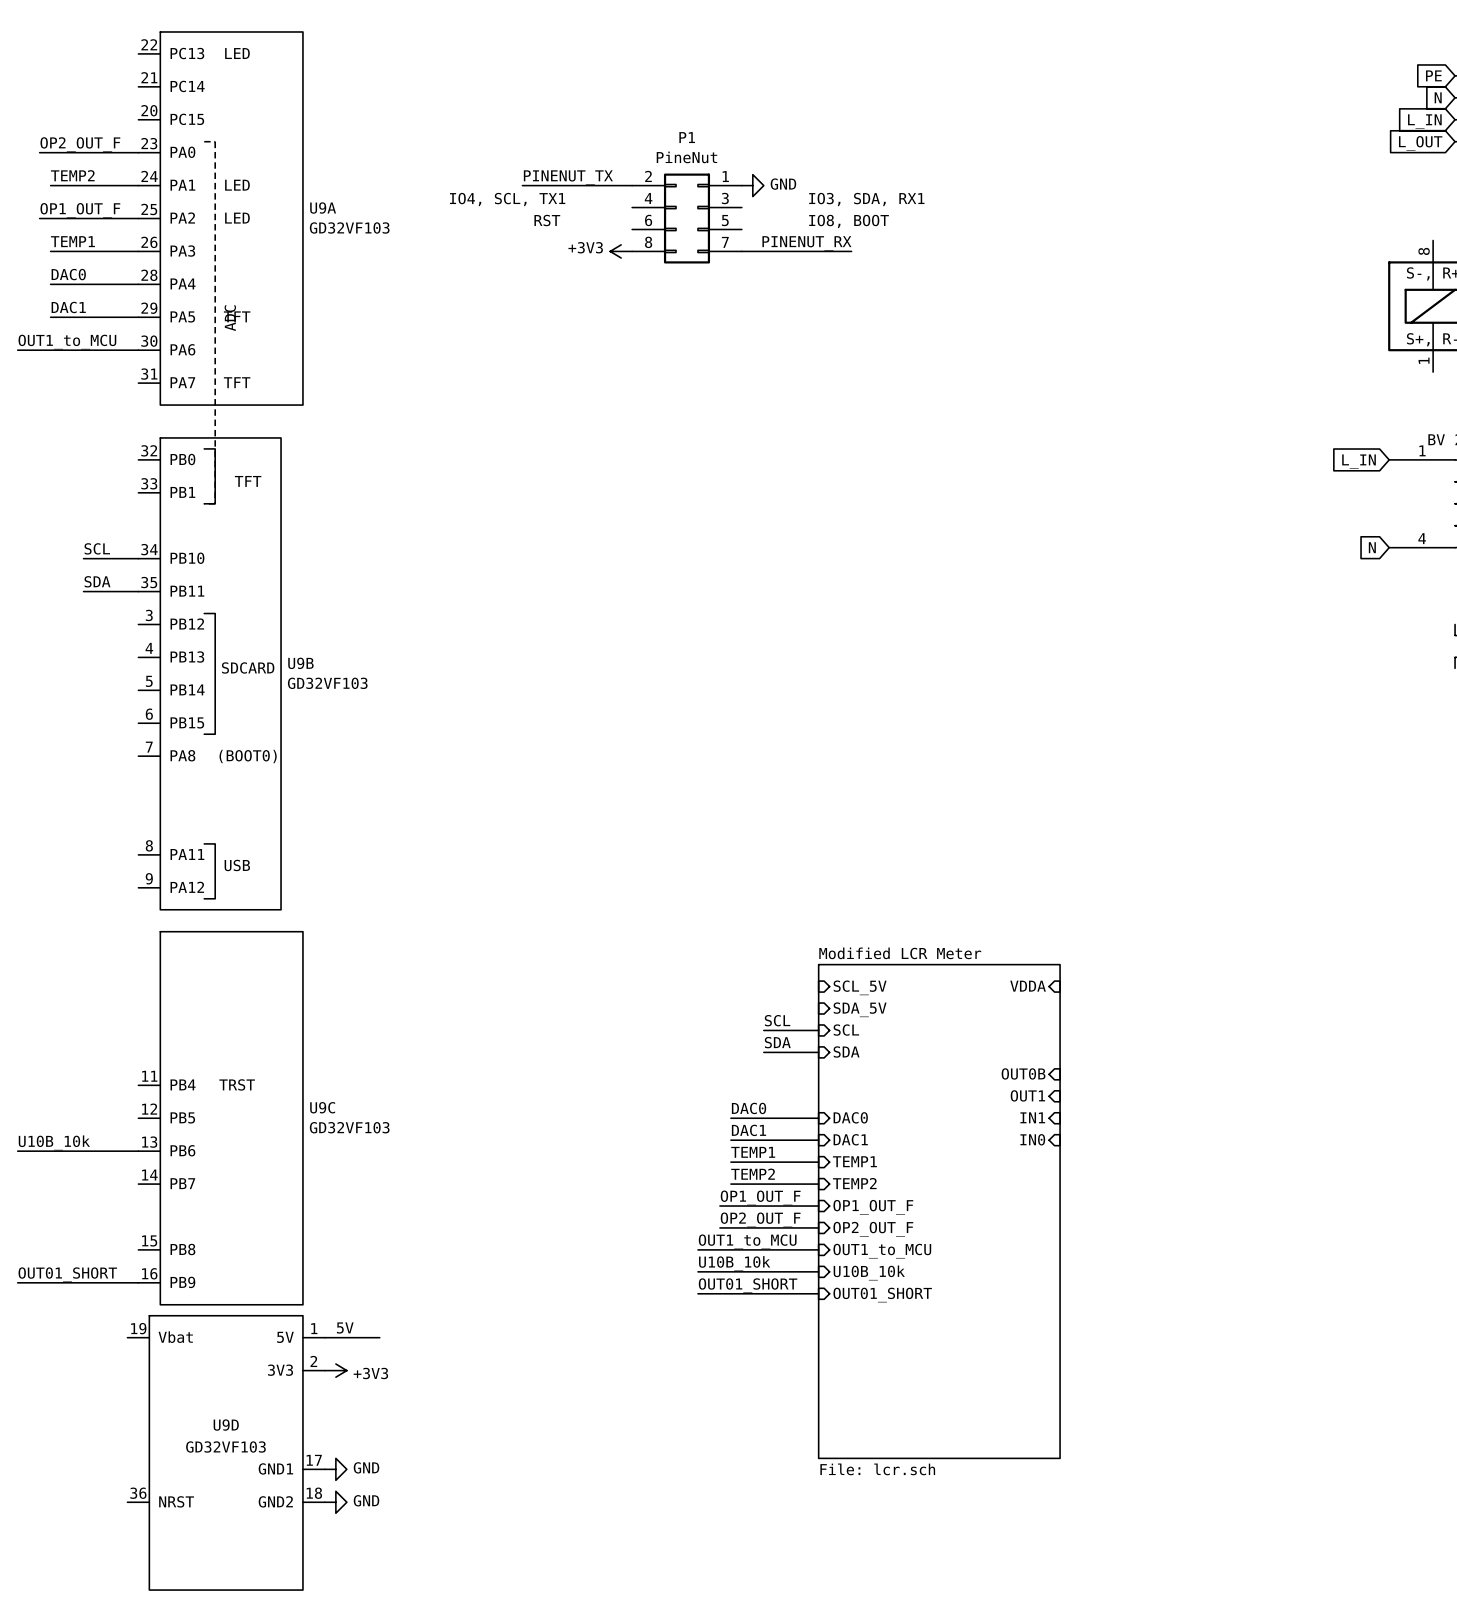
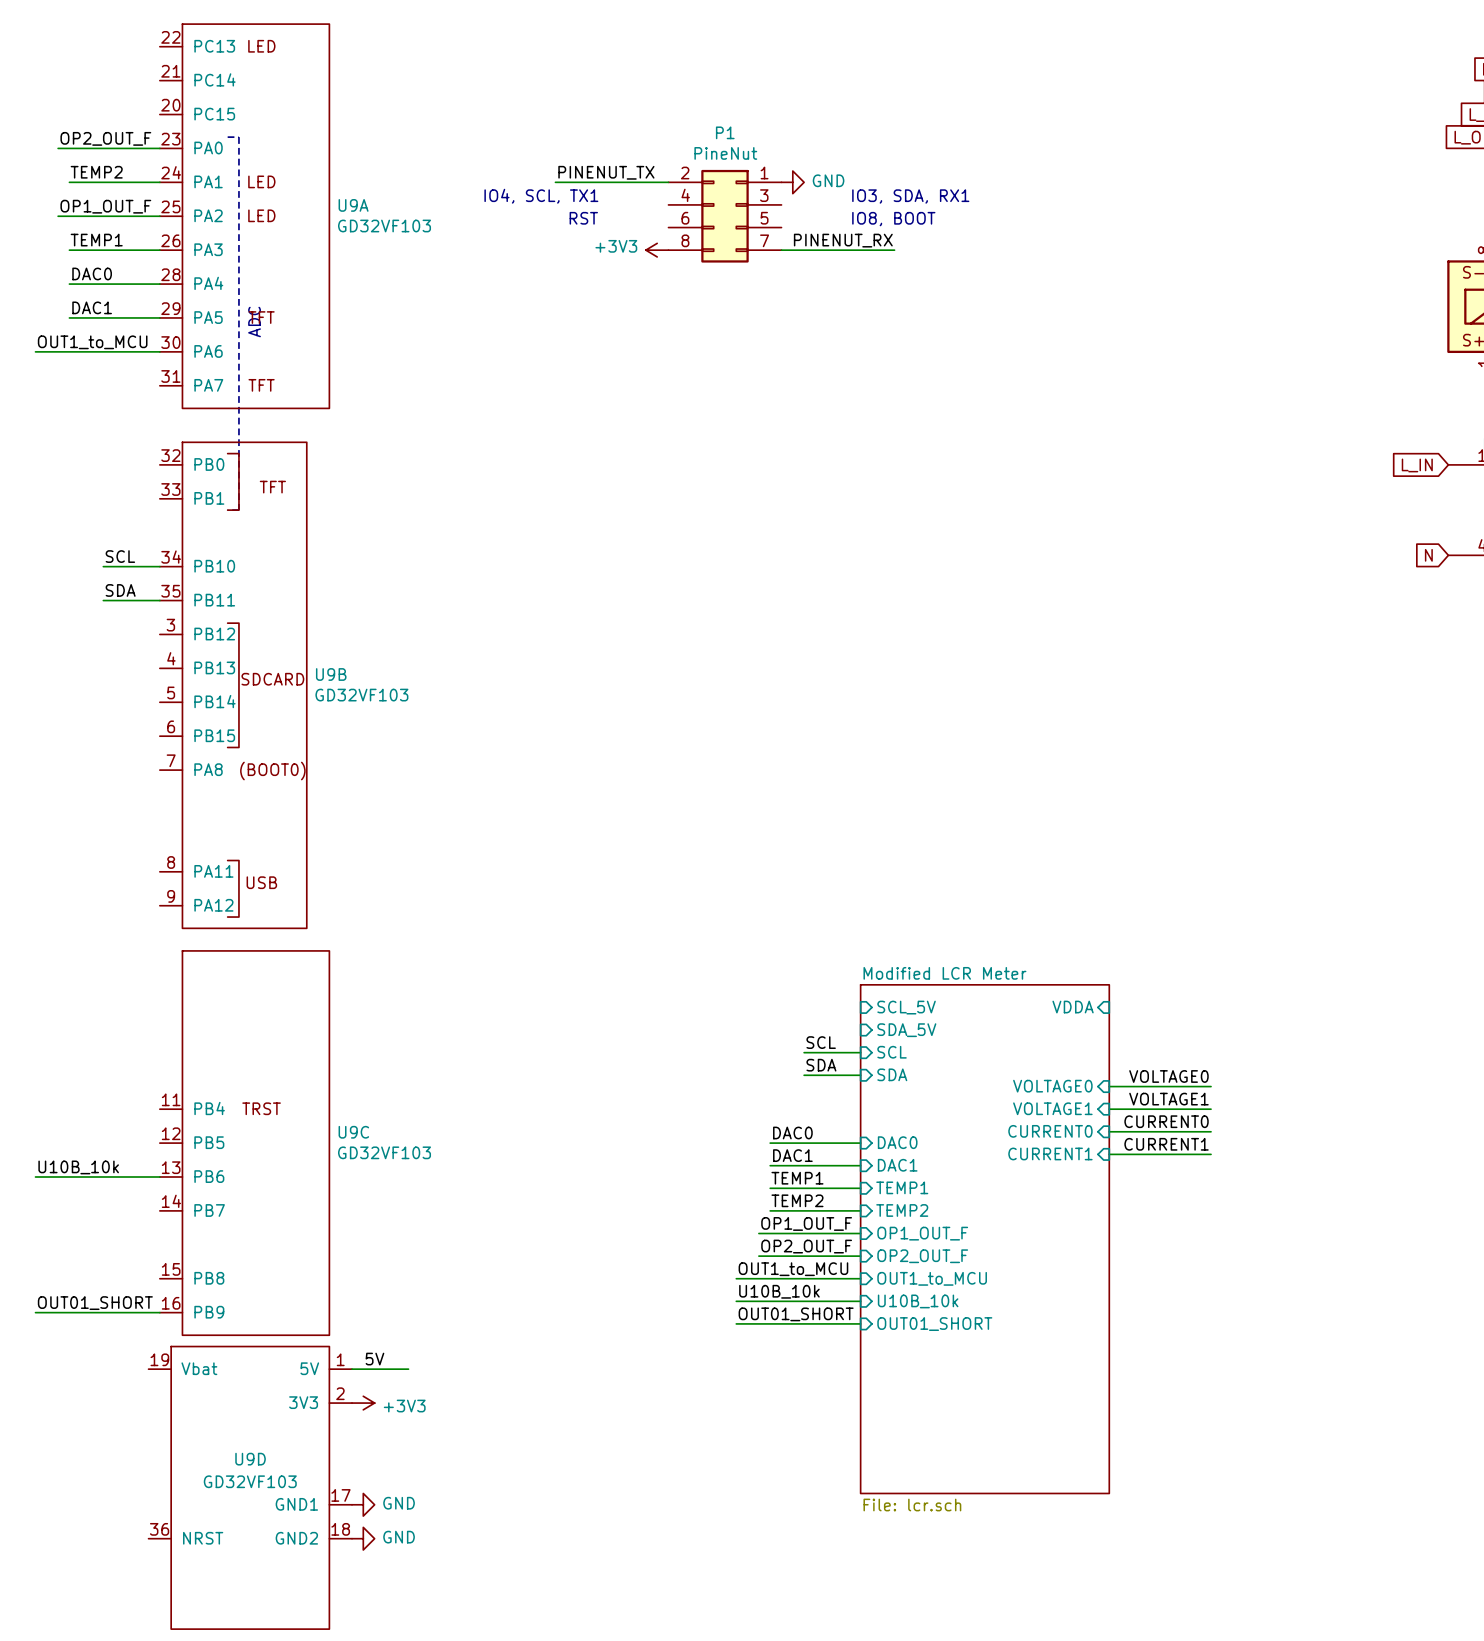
label: none -> VOLTAGE0 (1168, 1076)
sheet pin: none -> VOLTAGE0 (1052, 1086)
wire: none -> (1109, 1086) (1211, 1086)
sheet pin: OUT0B (1023, 1073) -> none
label: none -> VOLTAGE1 (1168, 1099)
sheet pin: none -> VOLTAGE1 (1052, 1108)
wire: none -> (1109, 1109) (1211, 1109)
sheet pin: OUT1 (1027, 1095) -> none
label: none -> CURRENT0 (1166, 1121)
sheet pin: none -> CURRENT0 (1050, 1131)
wire: none -> (1109, 1131) (1211, 1131)
sheet pin: IN1 (1032, 1117) -> none
label: none -> CURRENT1 (1166, 1144)
sheet pin: none -> CURRENT1 (1050, 1153)
wire: none -> (1109, 1154) (1211, 1154)
sheet pin: IN0 (1032, 1139) -> none

